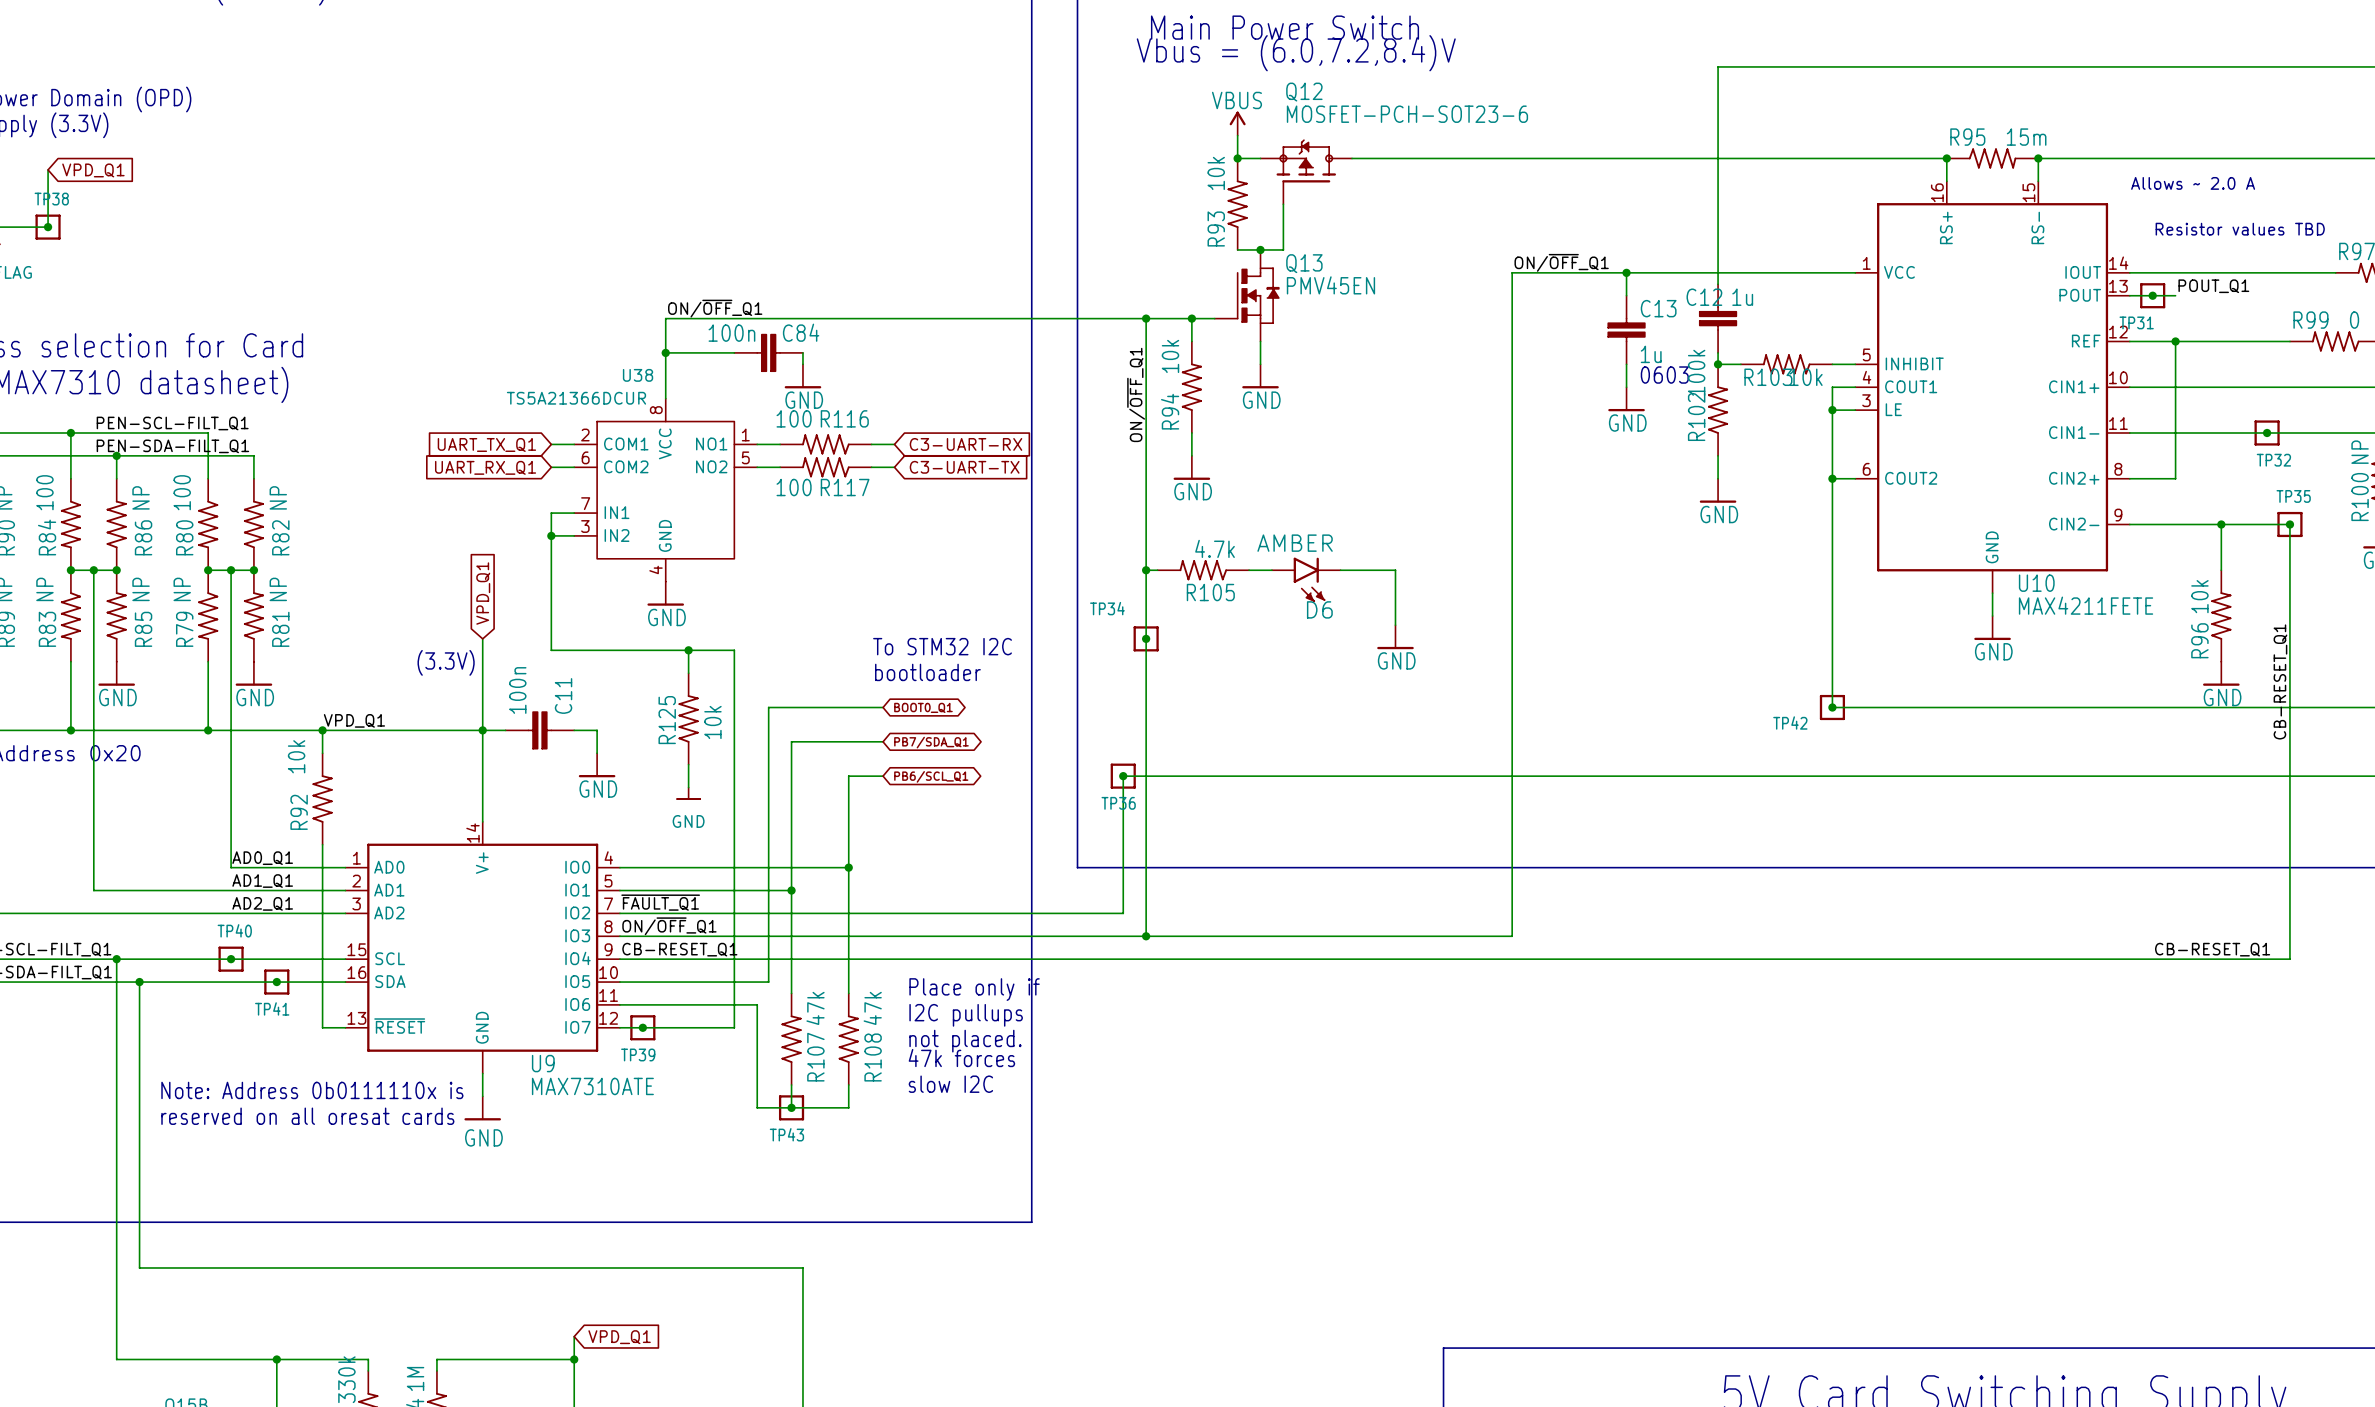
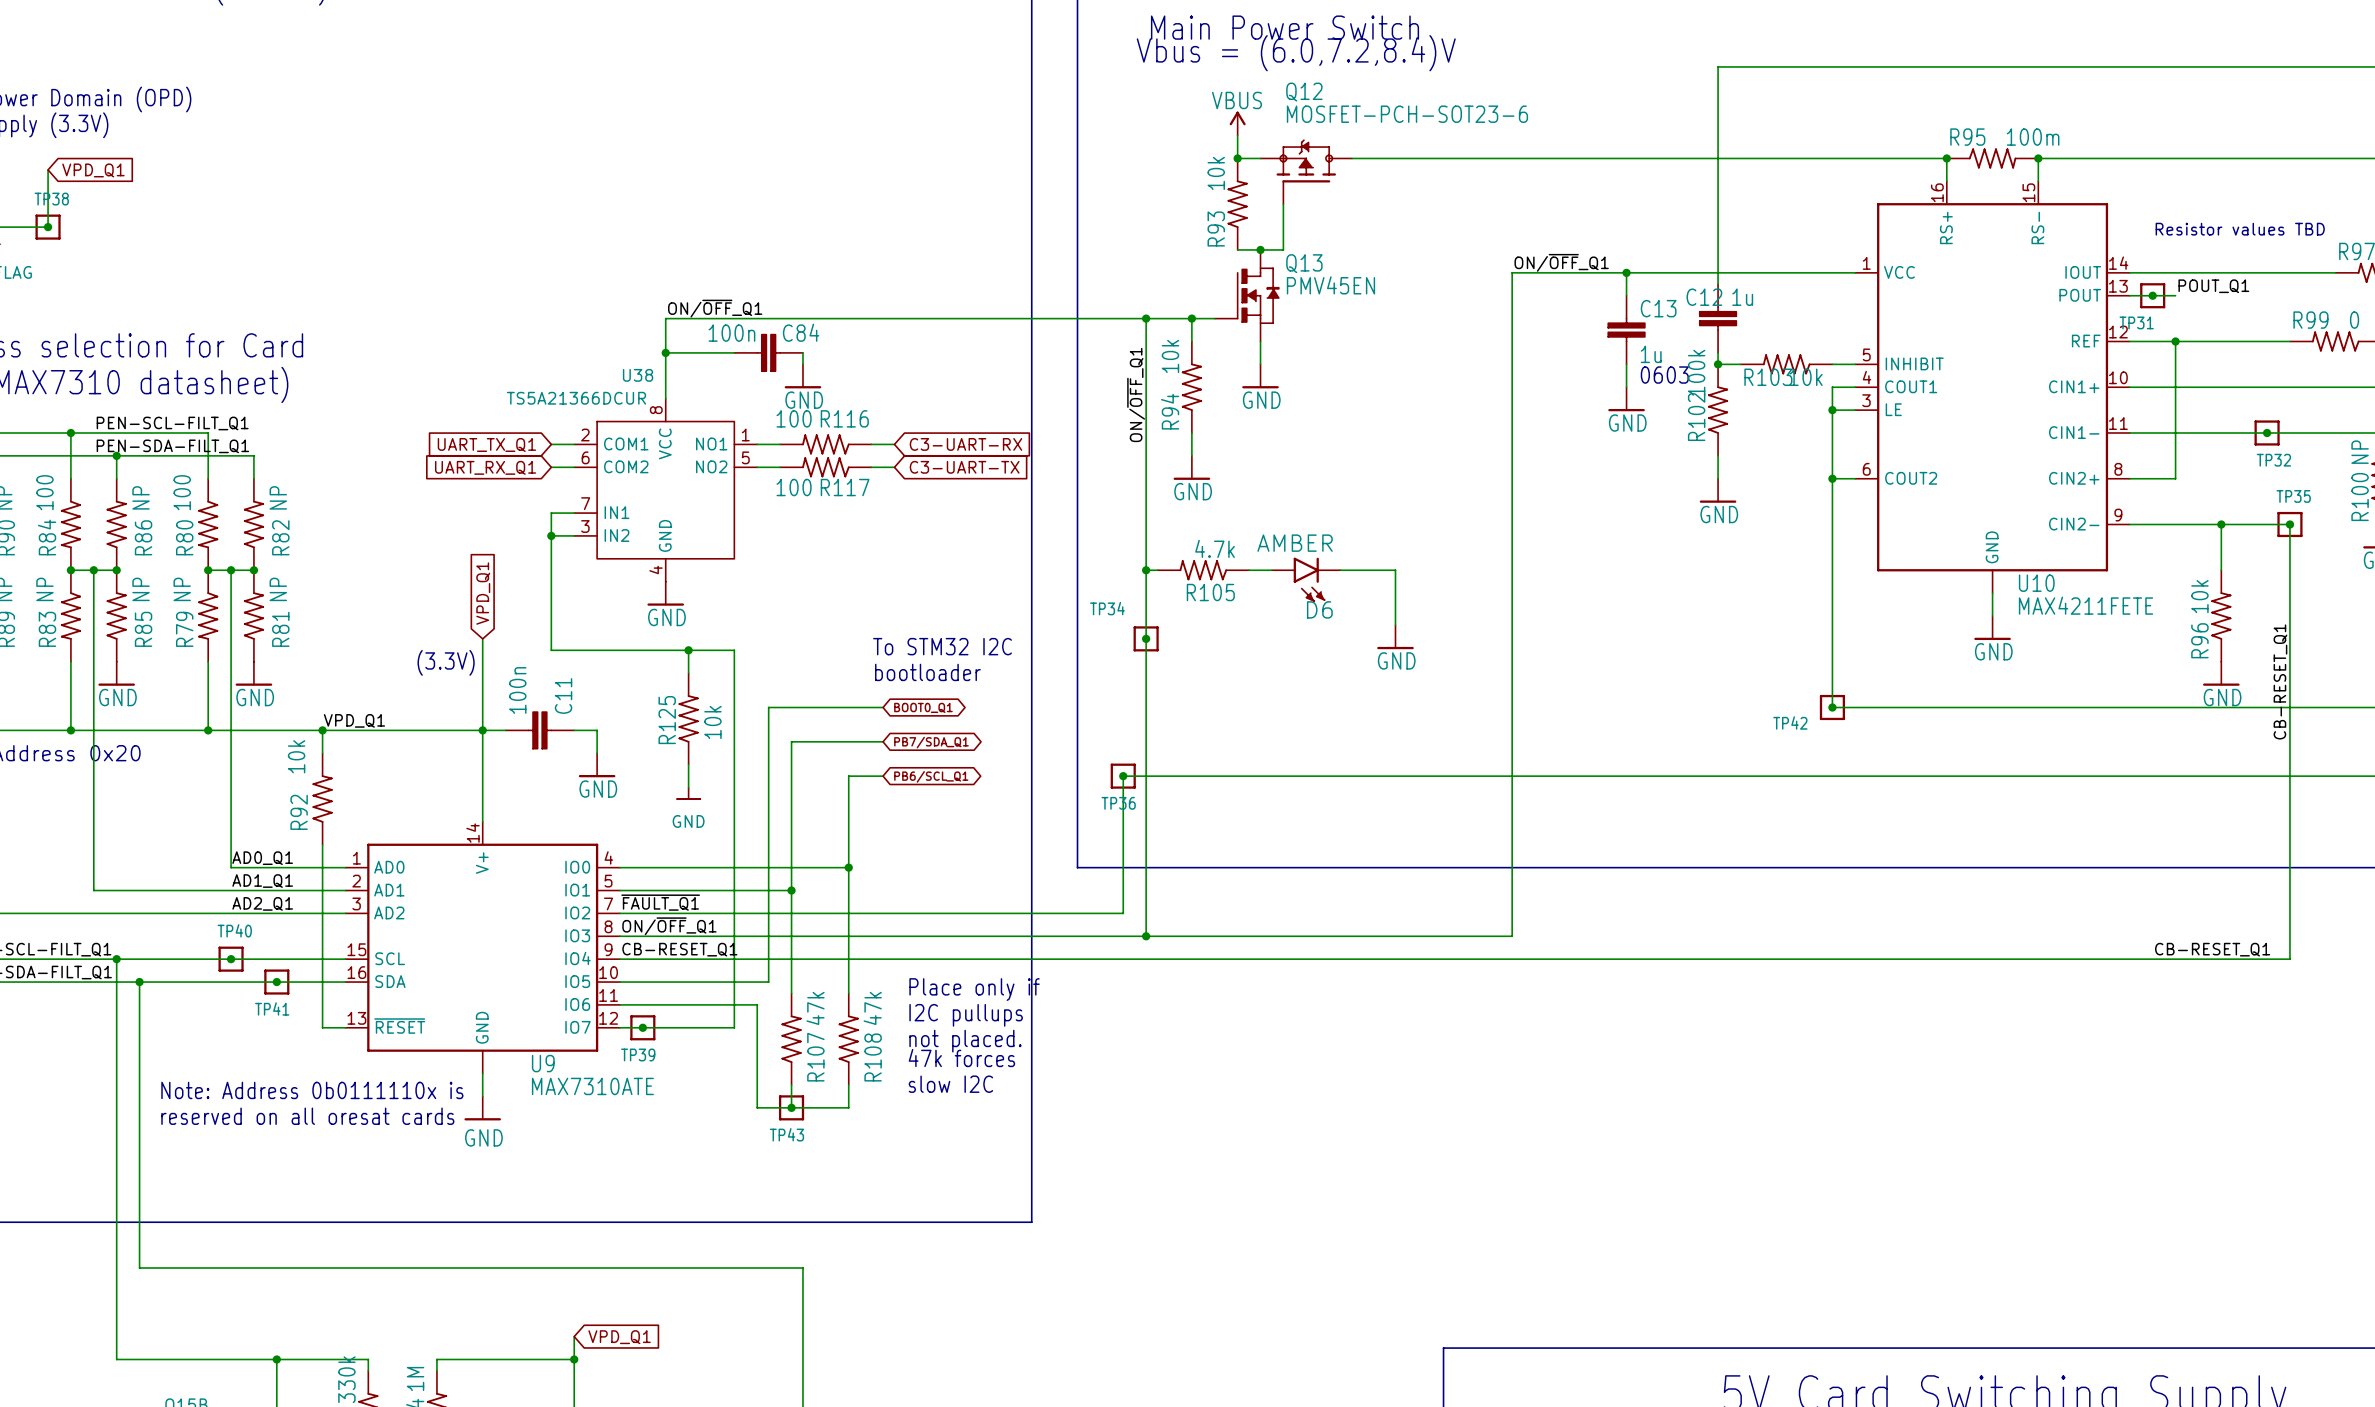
R95 value: 15m (2026, 137) -> 100m (2033, 137)
text: Allows ~ 2.0 A (2193, 183) -> none

